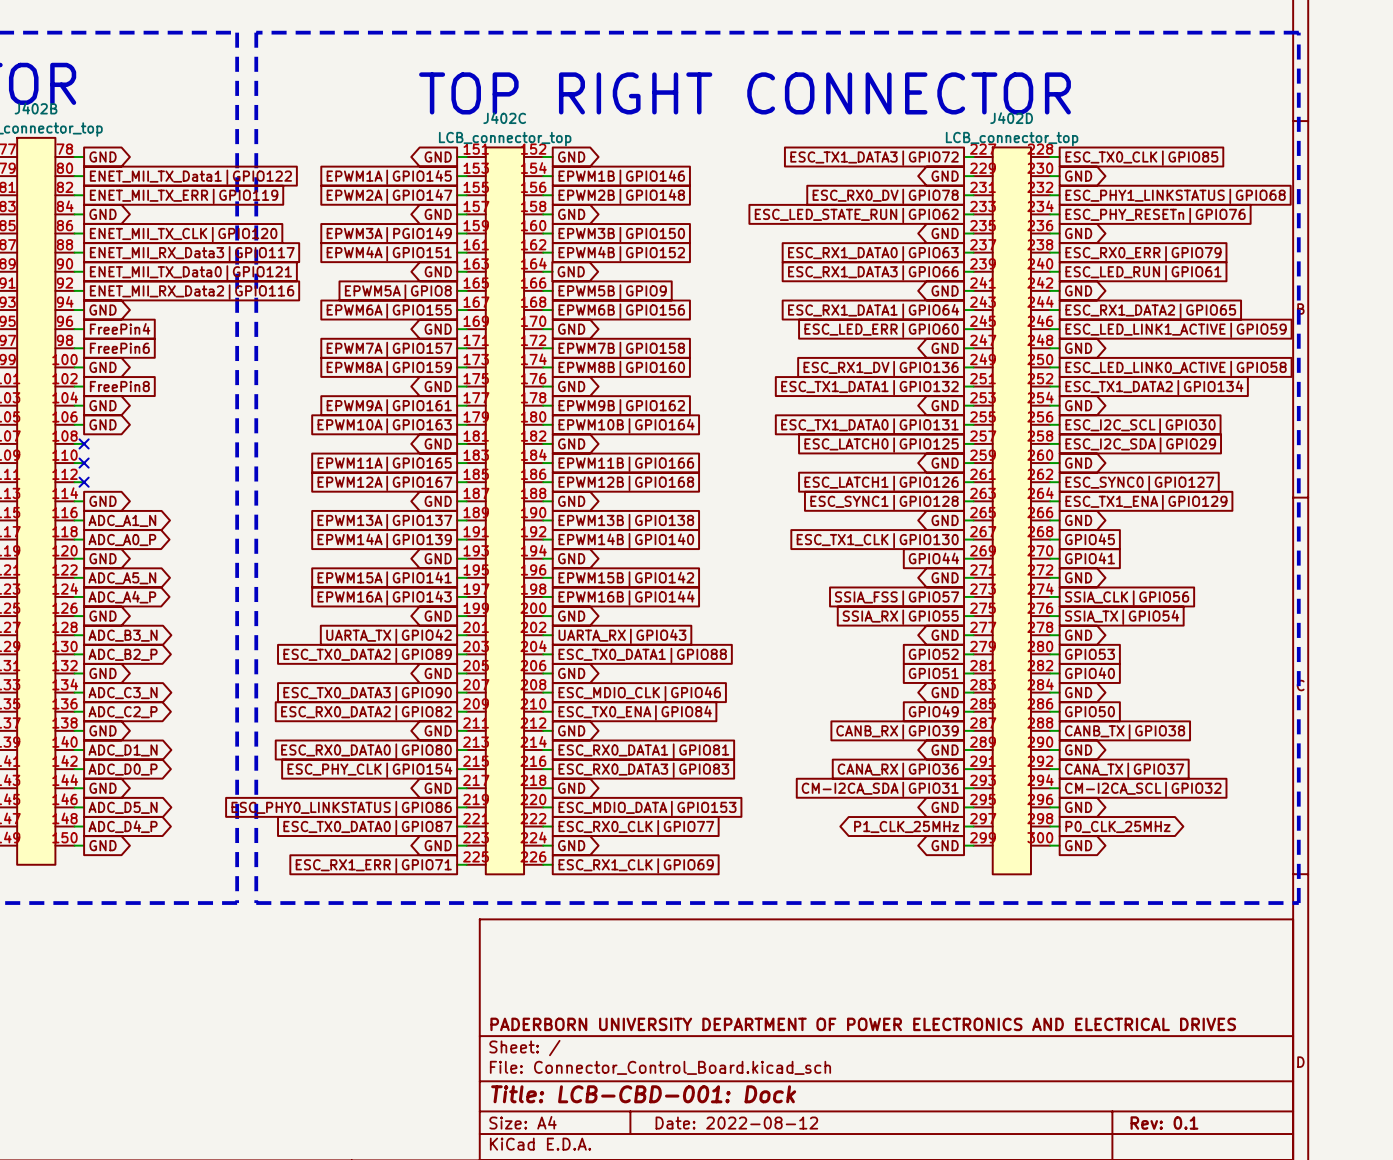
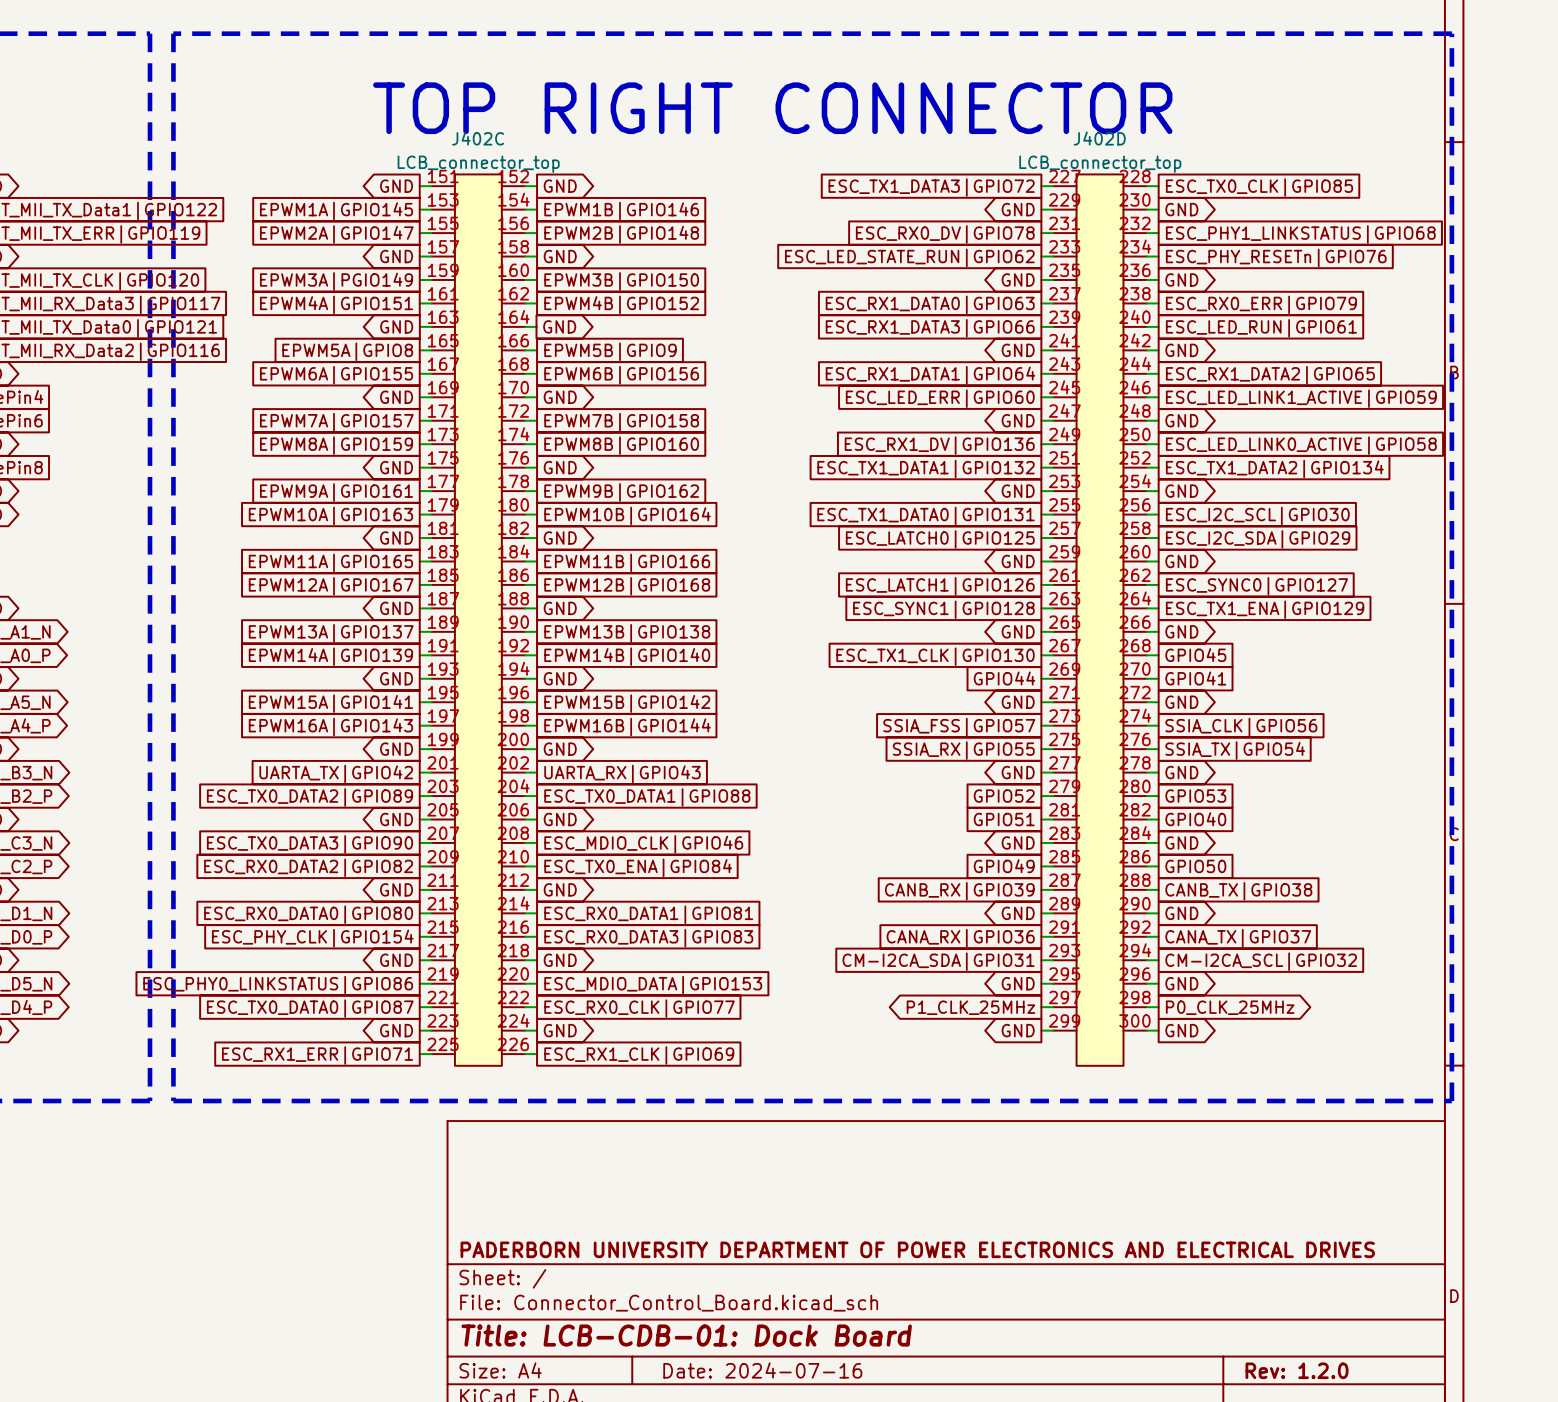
title block: Title: LCB-CBD-001: Dock (643, 1094) -> Title: LCB-CDB-01: Dock Board (686, 1335)
title block: Date: 2022-08-12 (736, 1123) -> Date: 2024-07-16 (762, 1370)
title block: Rev: 0.1 (1164, 1123) -> Rev: 1.2.0 (1297, 1370)

